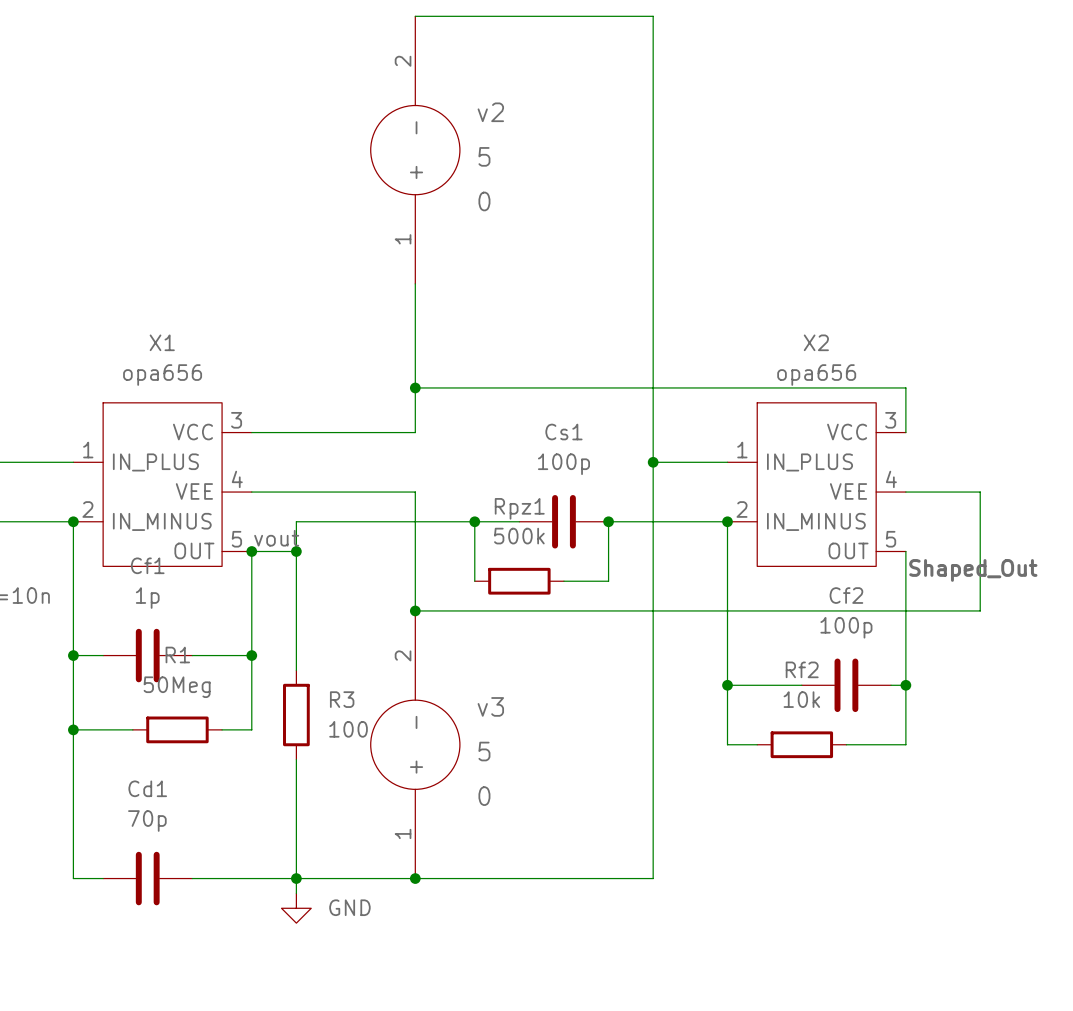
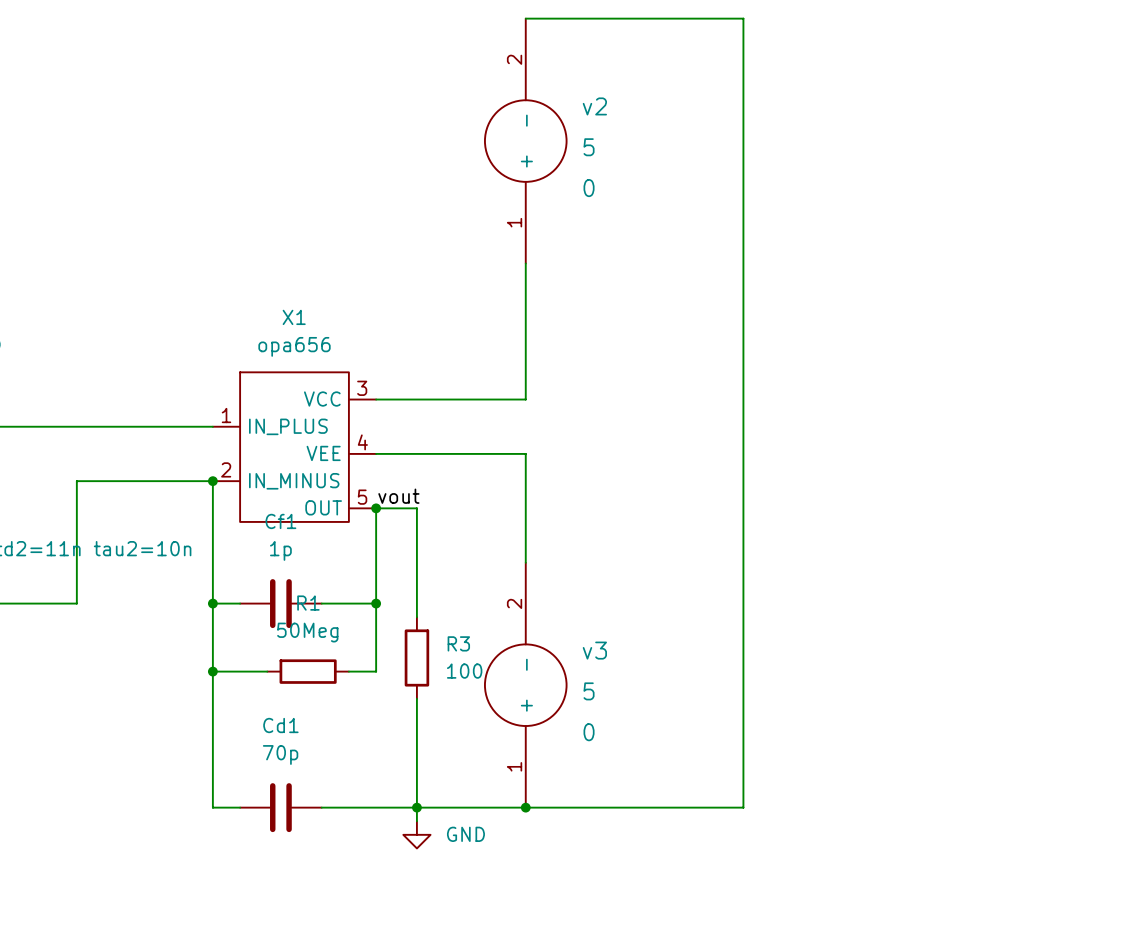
wire: (415, 387) (905, 387) (905, 432) -> none
junction: (415, 387) -> none
wire: (653, 462) (727, 462) -> none
junction: (653, 462) -> none
X2: opa656 (816, 484) -> none
wire: (905, 492) (980, 492) (980, 610) (415, 610) -> none
wire: (474, 521) (474, 581) -> none
junction: (474, 521) -> none
wire: (519, 521) (296, 521) (296, 551) -> none
Cs1: 100p (563, 521) -> none
junction: (608, 521) -> none
junction: (727, 521) -> none
junction: (296, 551) -> none
wire: (905, 551) (905, 744) (846, 744) -> none
label: Shaped_Out (973, 570) -> none
Rpz1: 500k (519, 581) -> none
wire: (563, 581) (608, 581) (608, 521) (727, 521) (727, 744) (757, 744) -> none
junction: (415, 610) -> none
wire: (727, 685) (801, 685) -> none
junction: (727, 685) -> none
Cf2: 100p (846, 685) -> none
wire: (891, 685) (905, 685) -> none
junction: (905, 685) -> none
Rf2: 10k (801, 744) -> none

